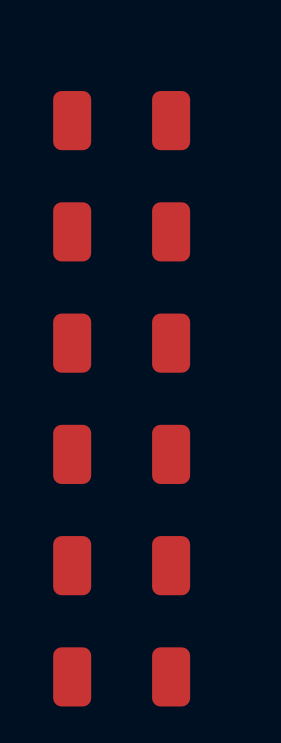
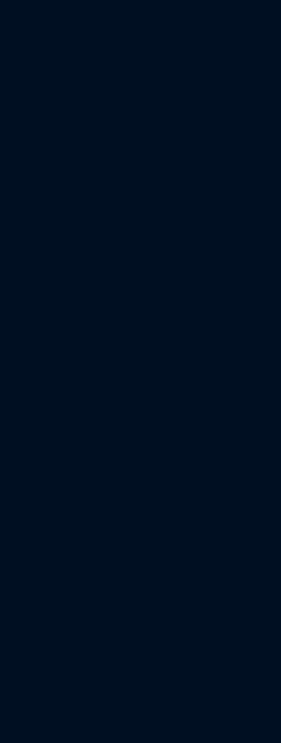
part: (121, 120) -> none
part: (121, 231) -> none
part: (121, 343) -> none
part: (121, 454) -> none
part: (121, 565) -> none
part: (121, 676) -> none

